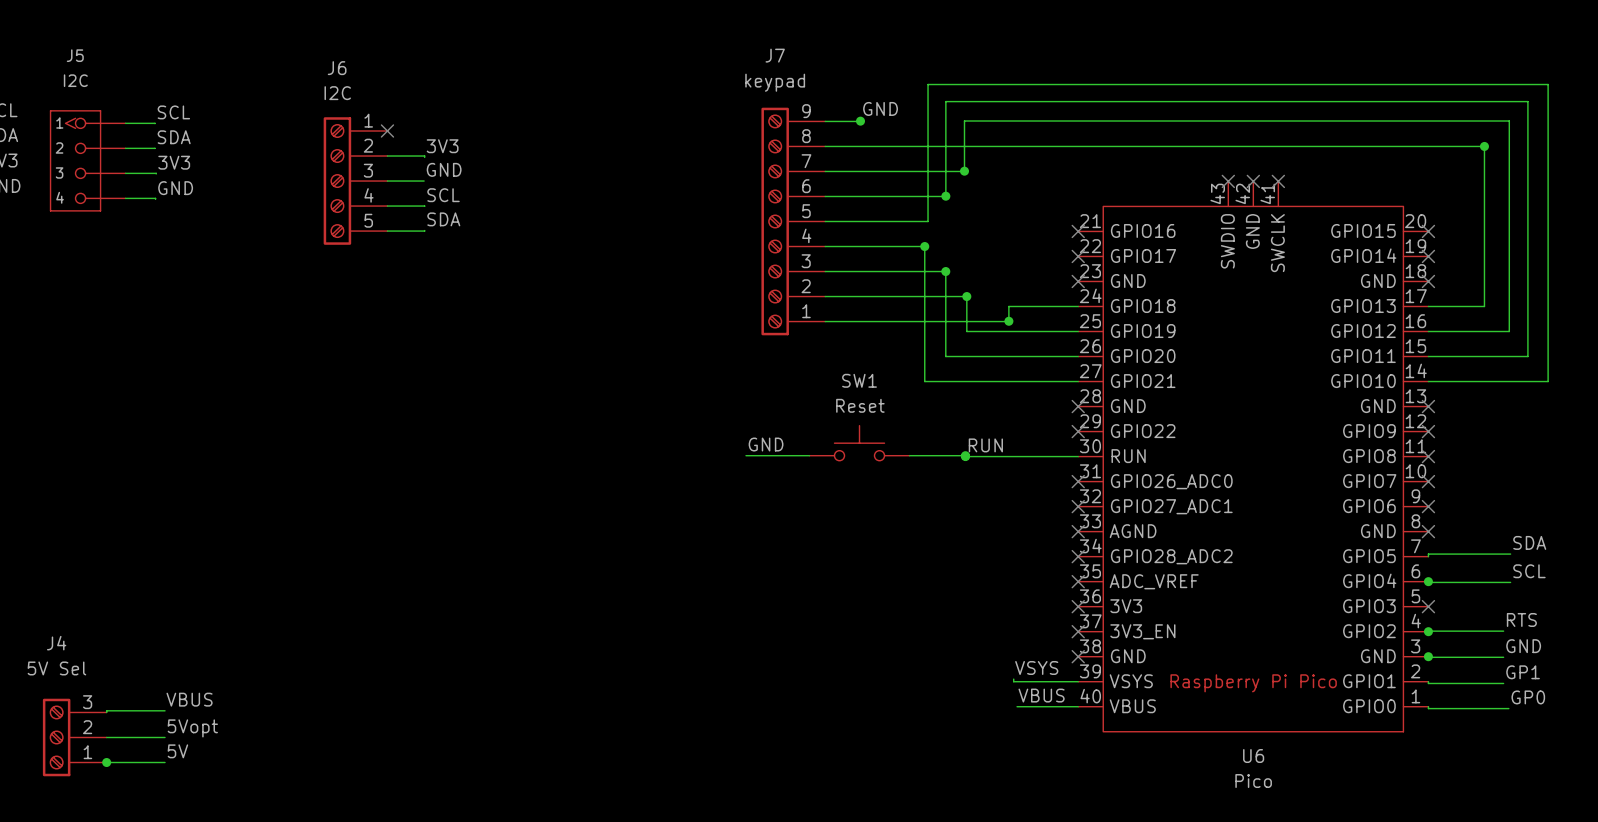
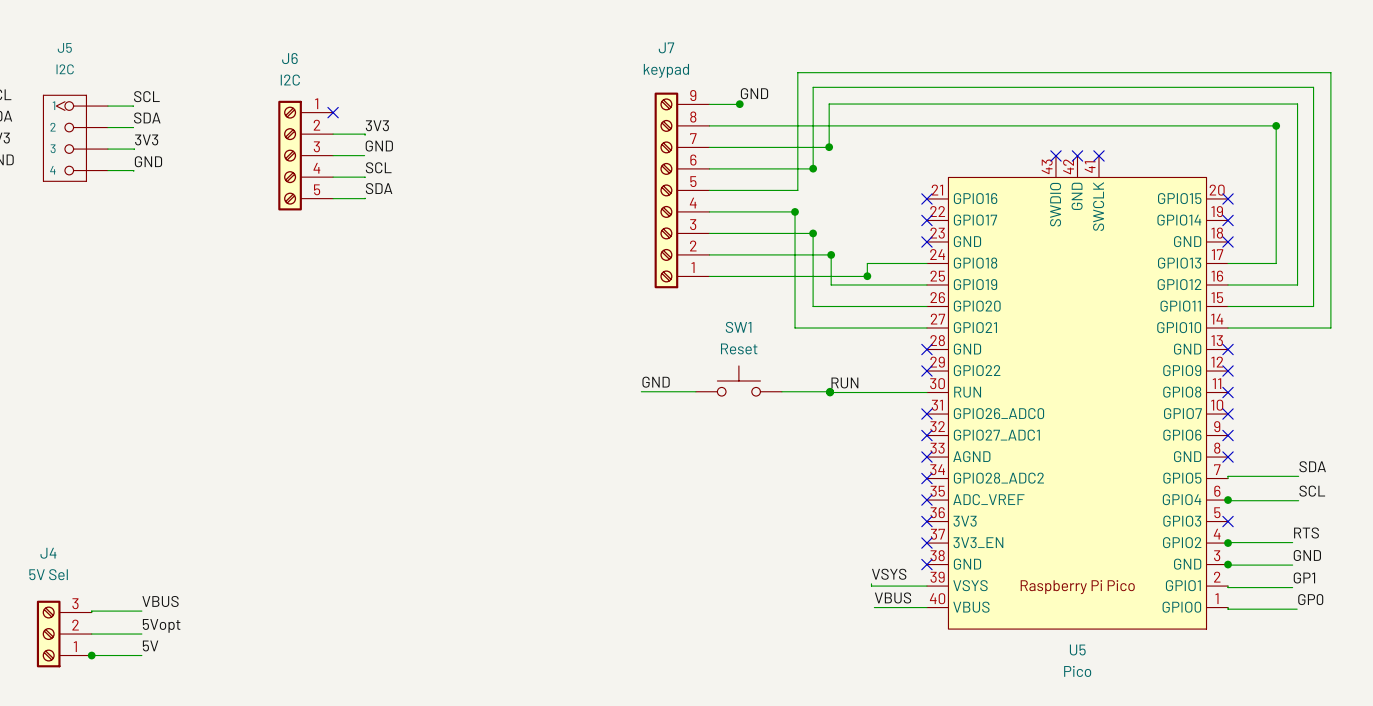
U6 name: U6 (1253, 756) -> U5 (1077, 650)

